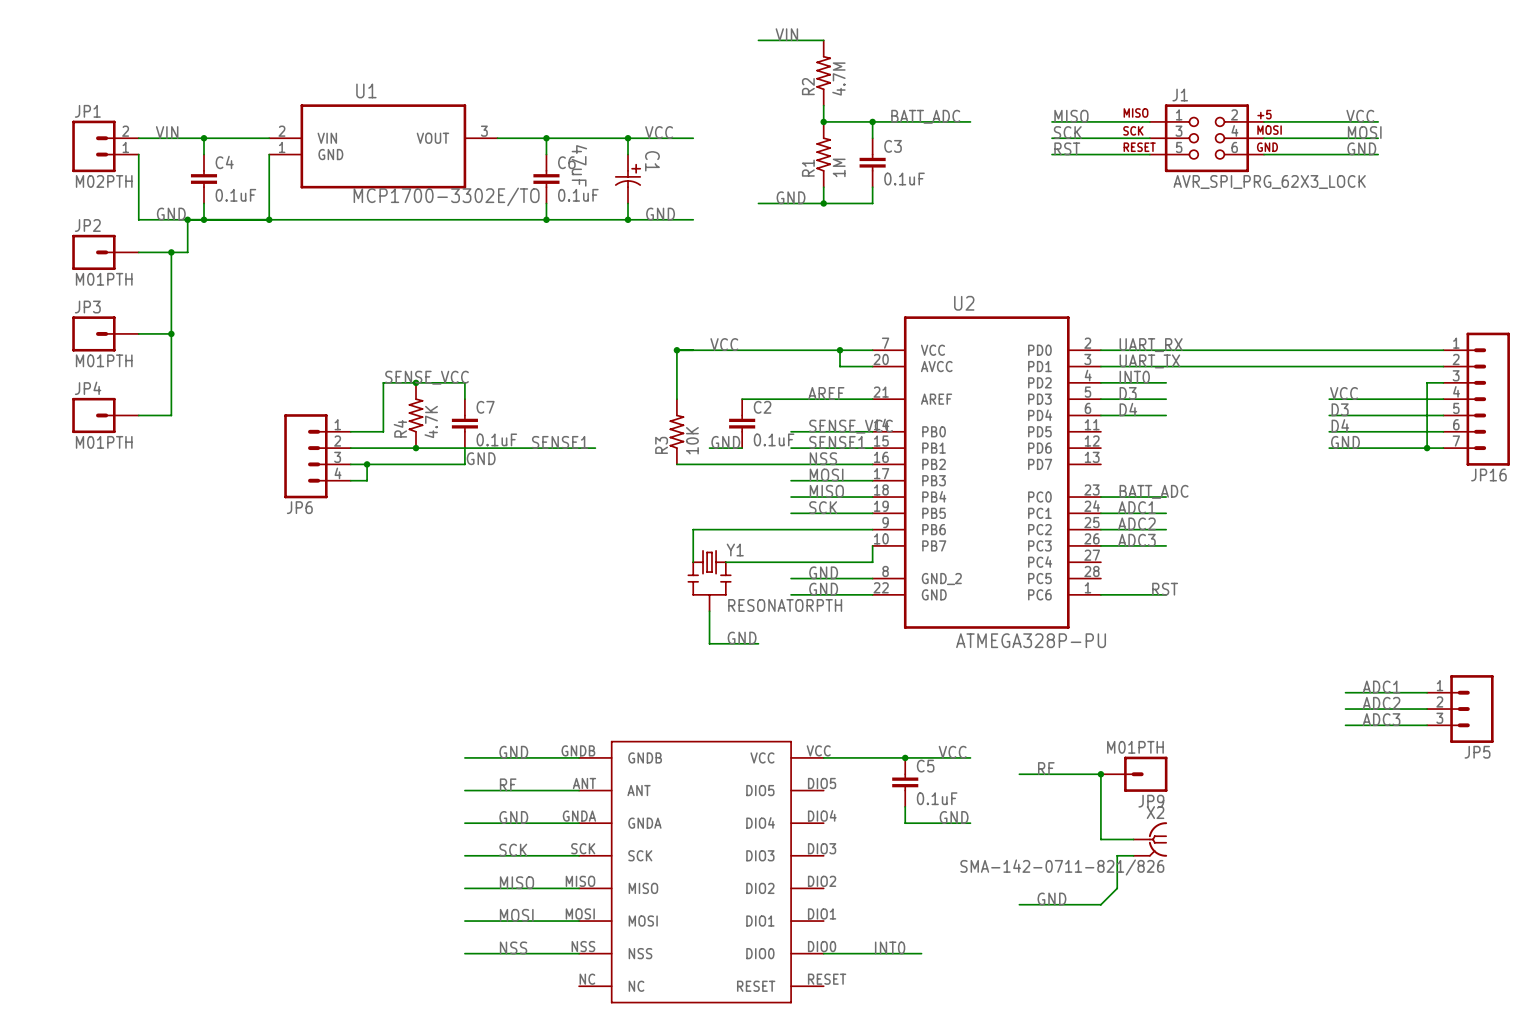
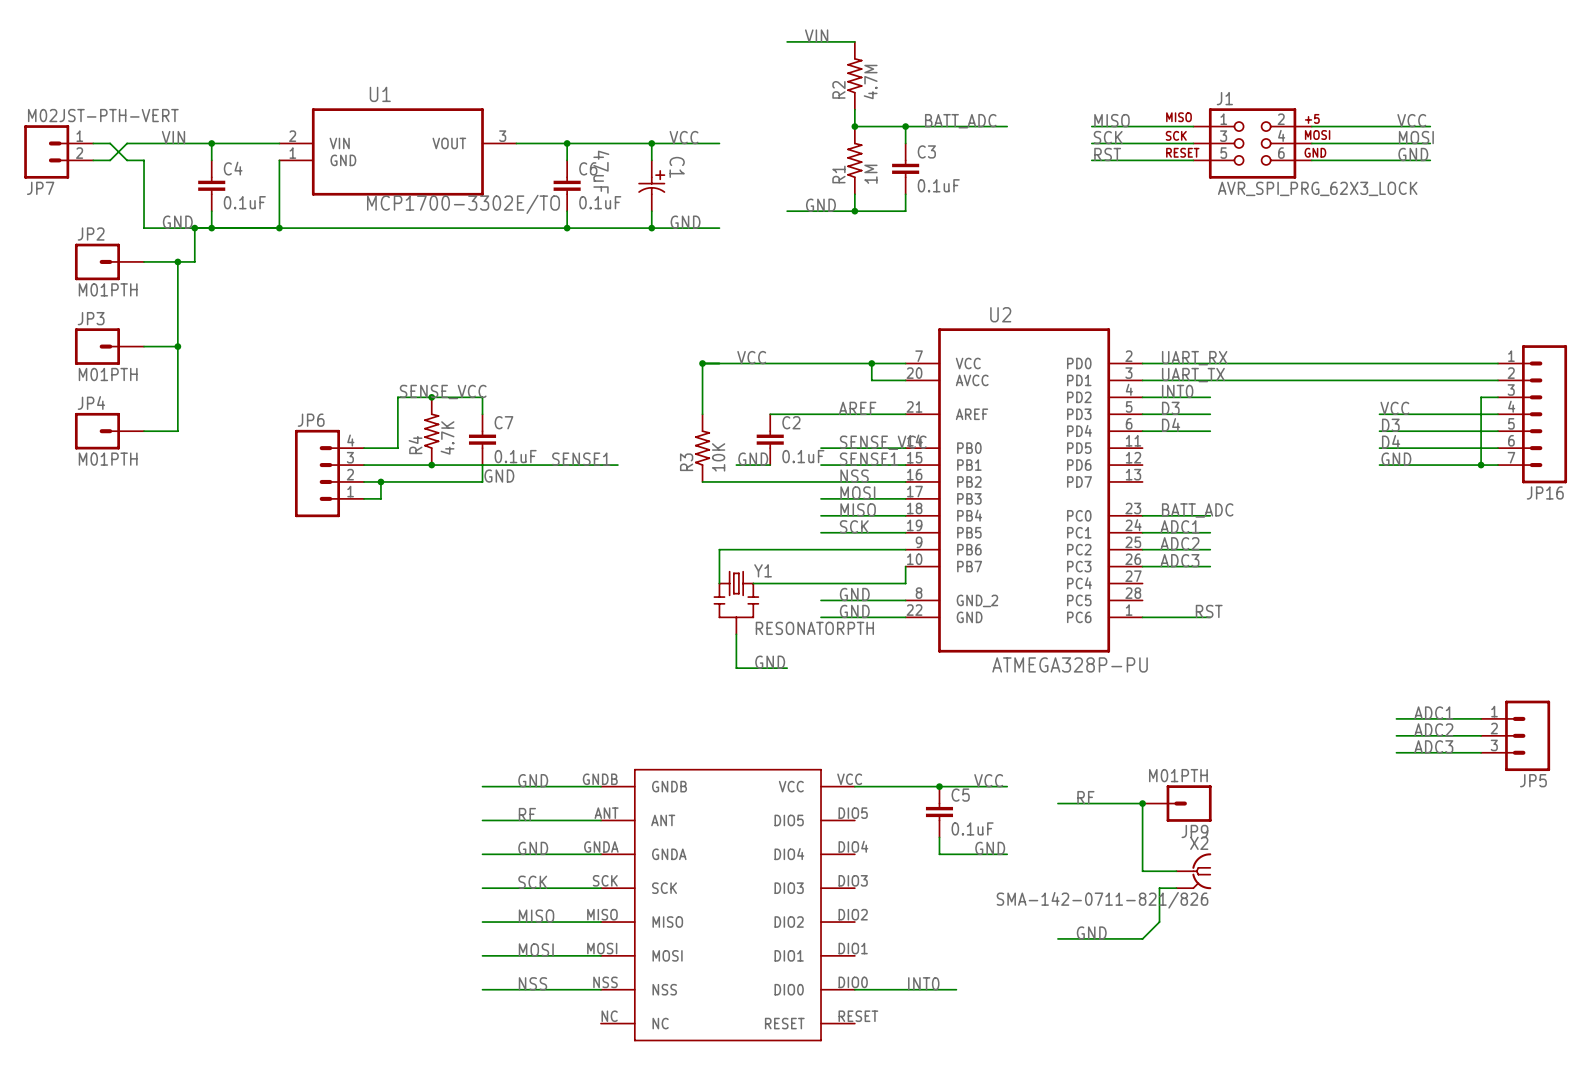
wire: none -> (93, 143) (110, 143) (127, 160) (144, 160)
JP7: none -> M02JST-PTH-VERT (58, 151)
JP1: M02PTH (105, 146) -> none
JP6 flip: as is (305, 456) -> up-down (317, 473)

